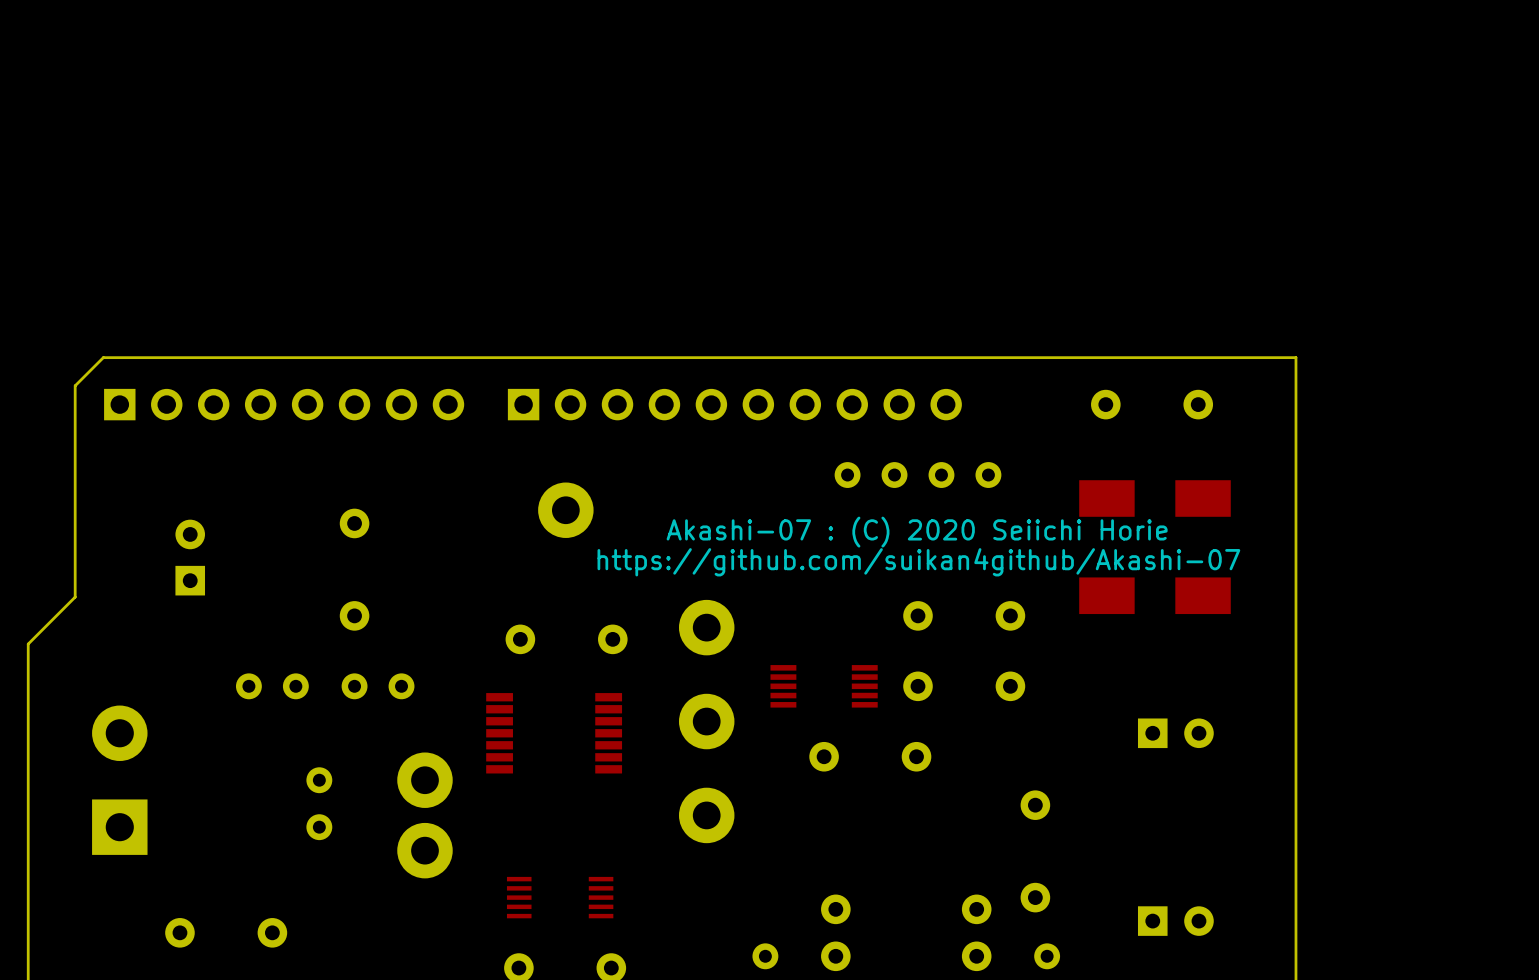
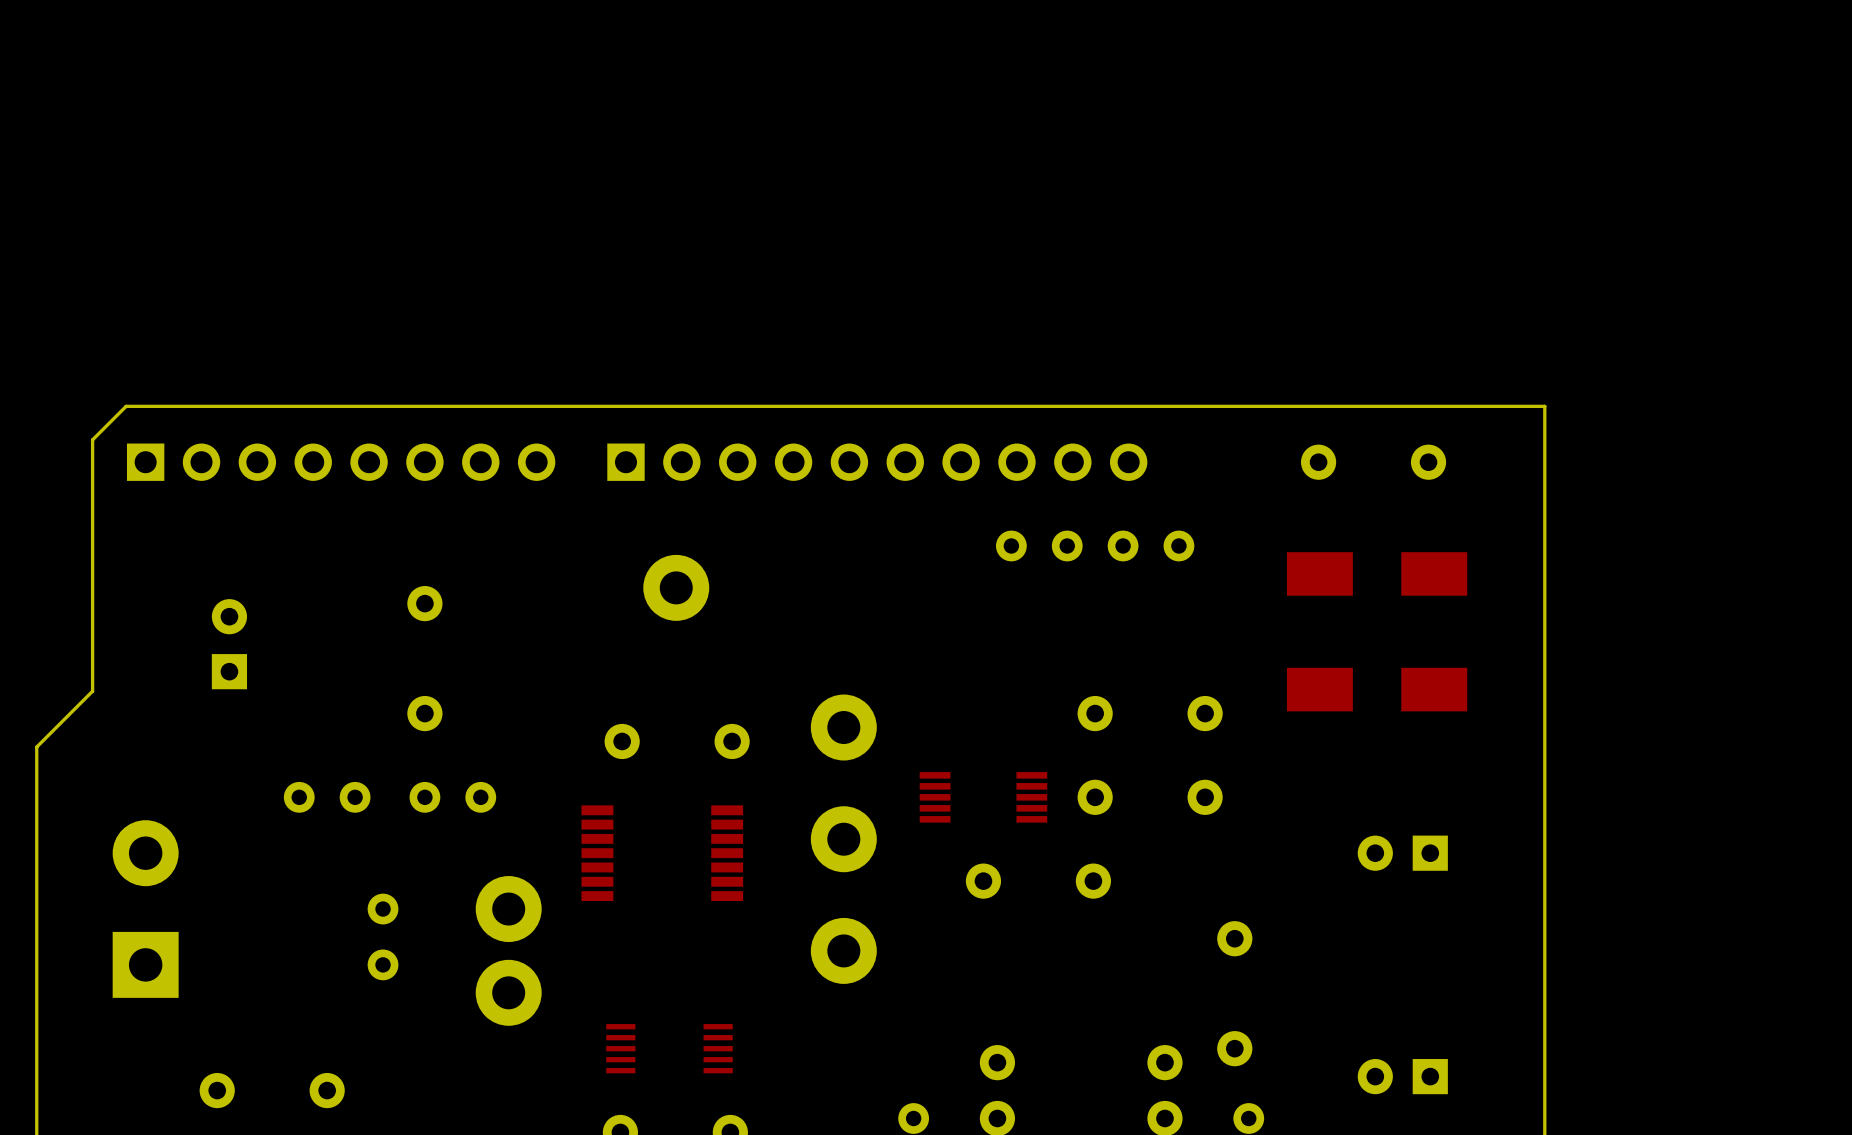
text: Akashi-07 : (C) 2020 Seiichi Horie (917, 532) -> none
text: https://github.com/suikan4github/Akashi-07 (918, 562) -> none
part rotation: 0° (1175, 733) -> 180° (1402, 853)
part rotation: 0° (1175, 921) -> 180° (1402, 1076)

